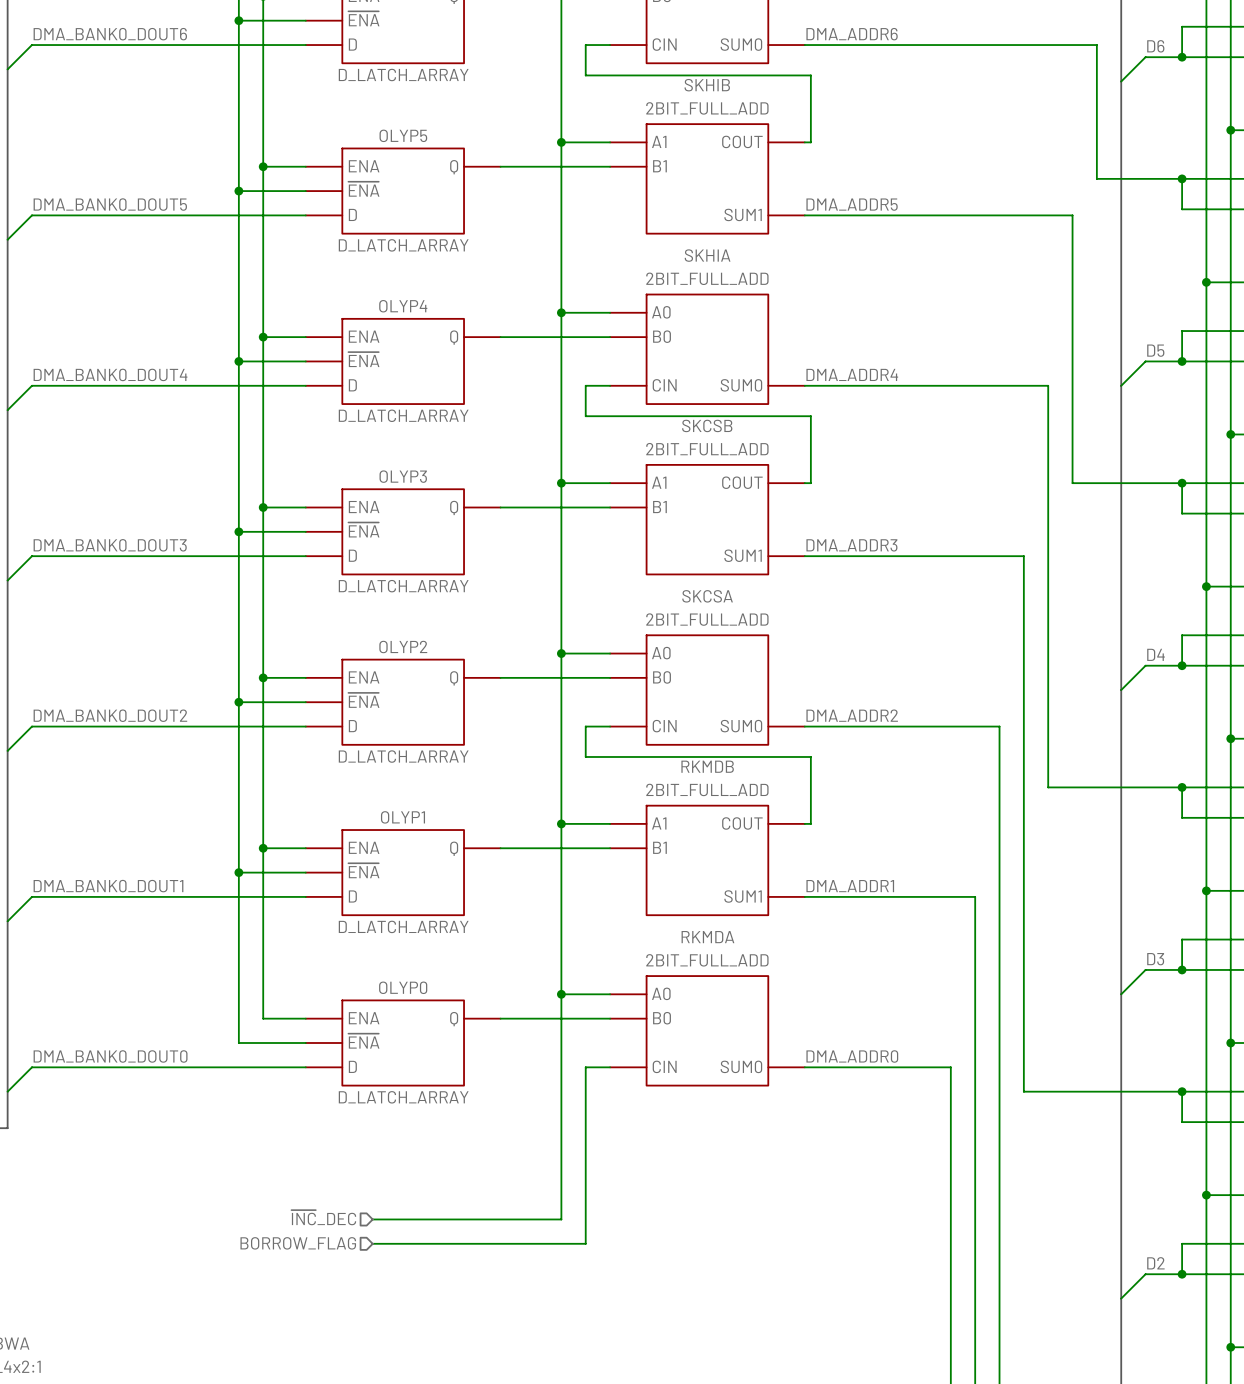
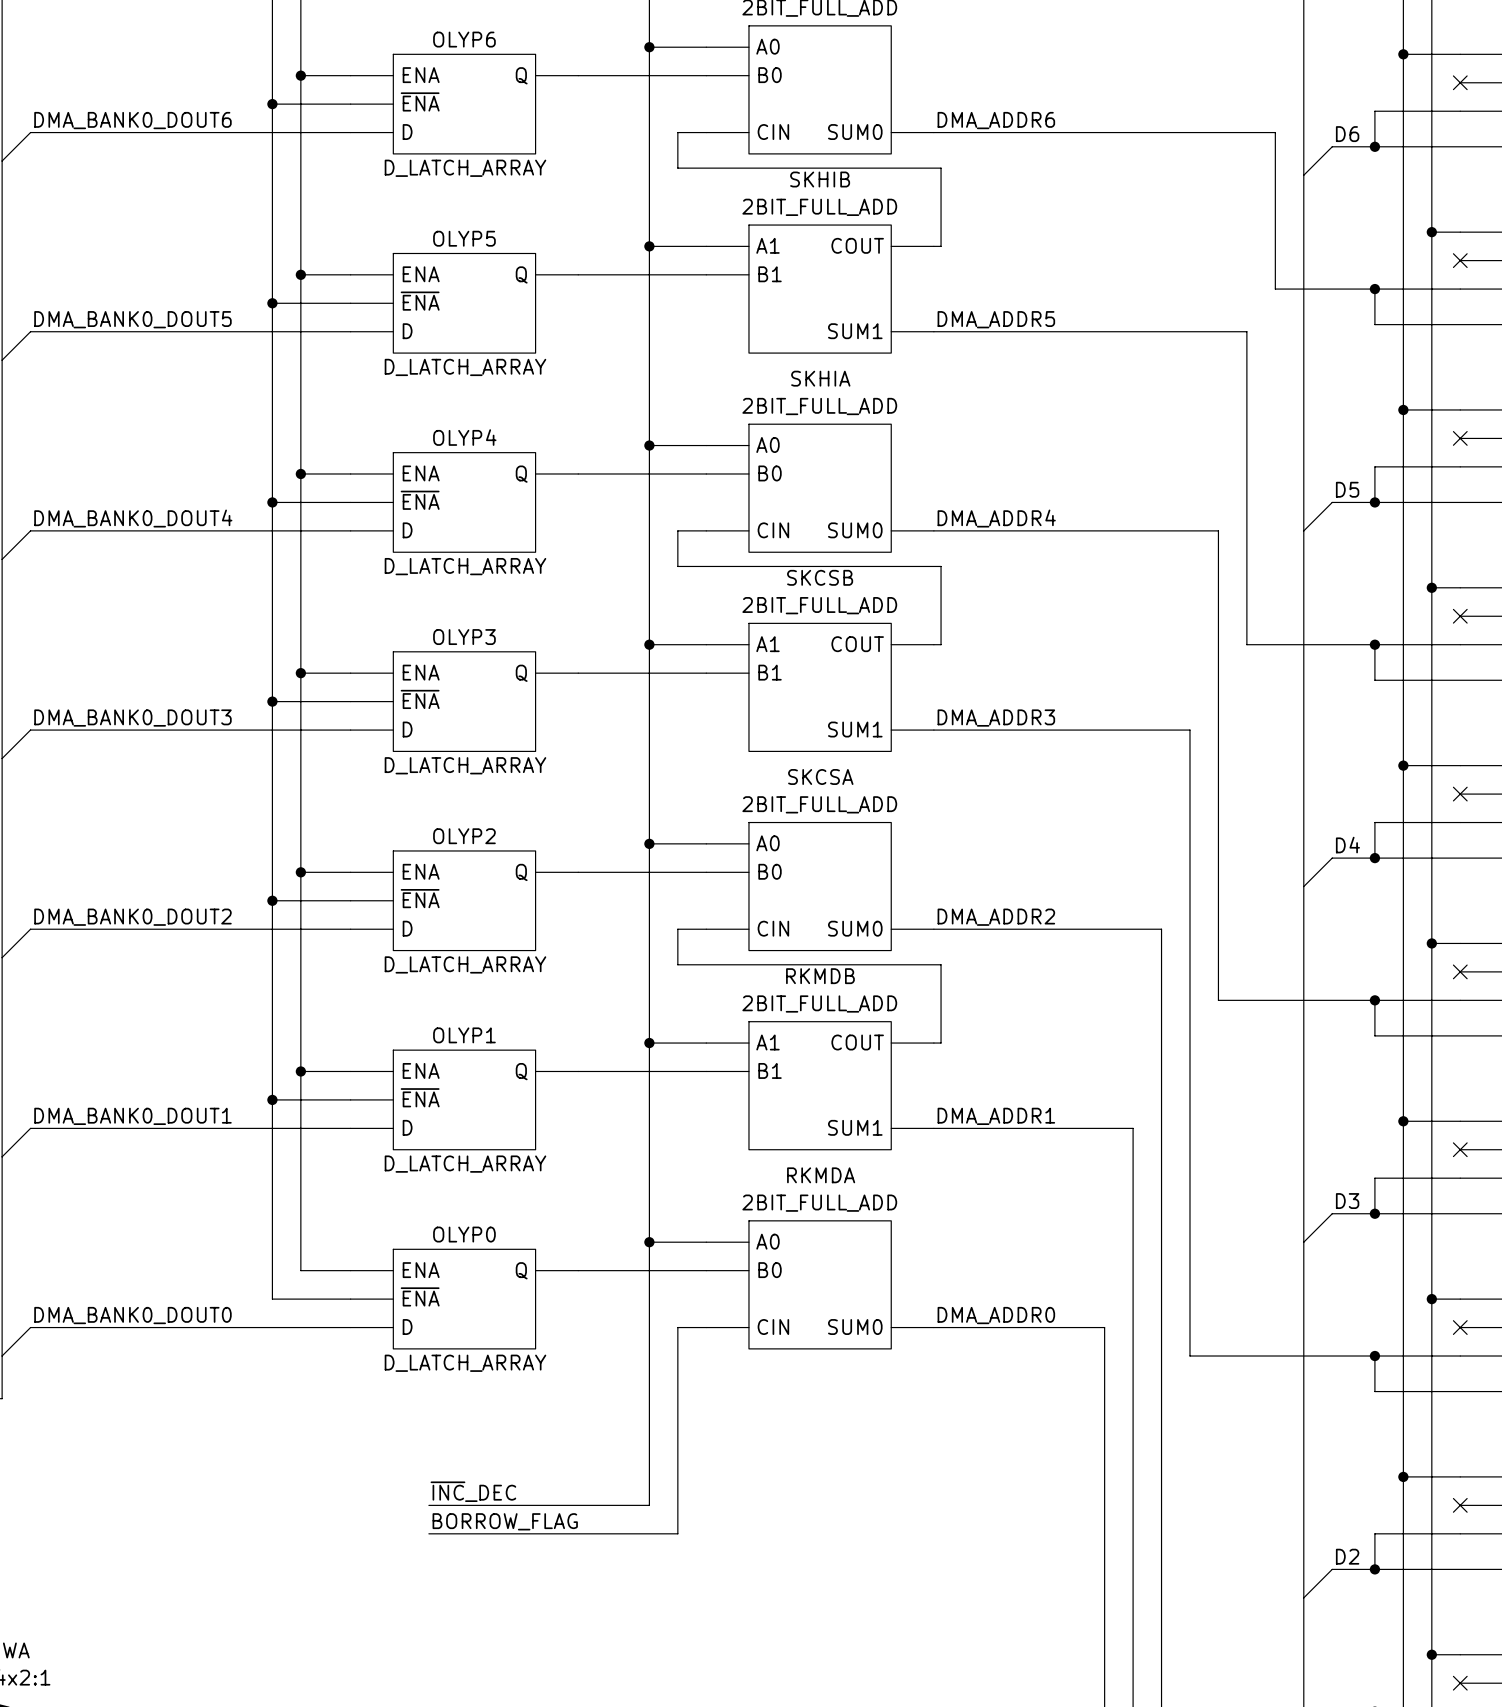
label: none -> ~{INC}_DEC (473, 1491)
hierarchical label: ~{INC}_DEC (323, 1217) -> none
label: none -> BORROW_FLAG (505, 1521)
hierarchical label: BORROW_FLAG (298, 1243) -> none

